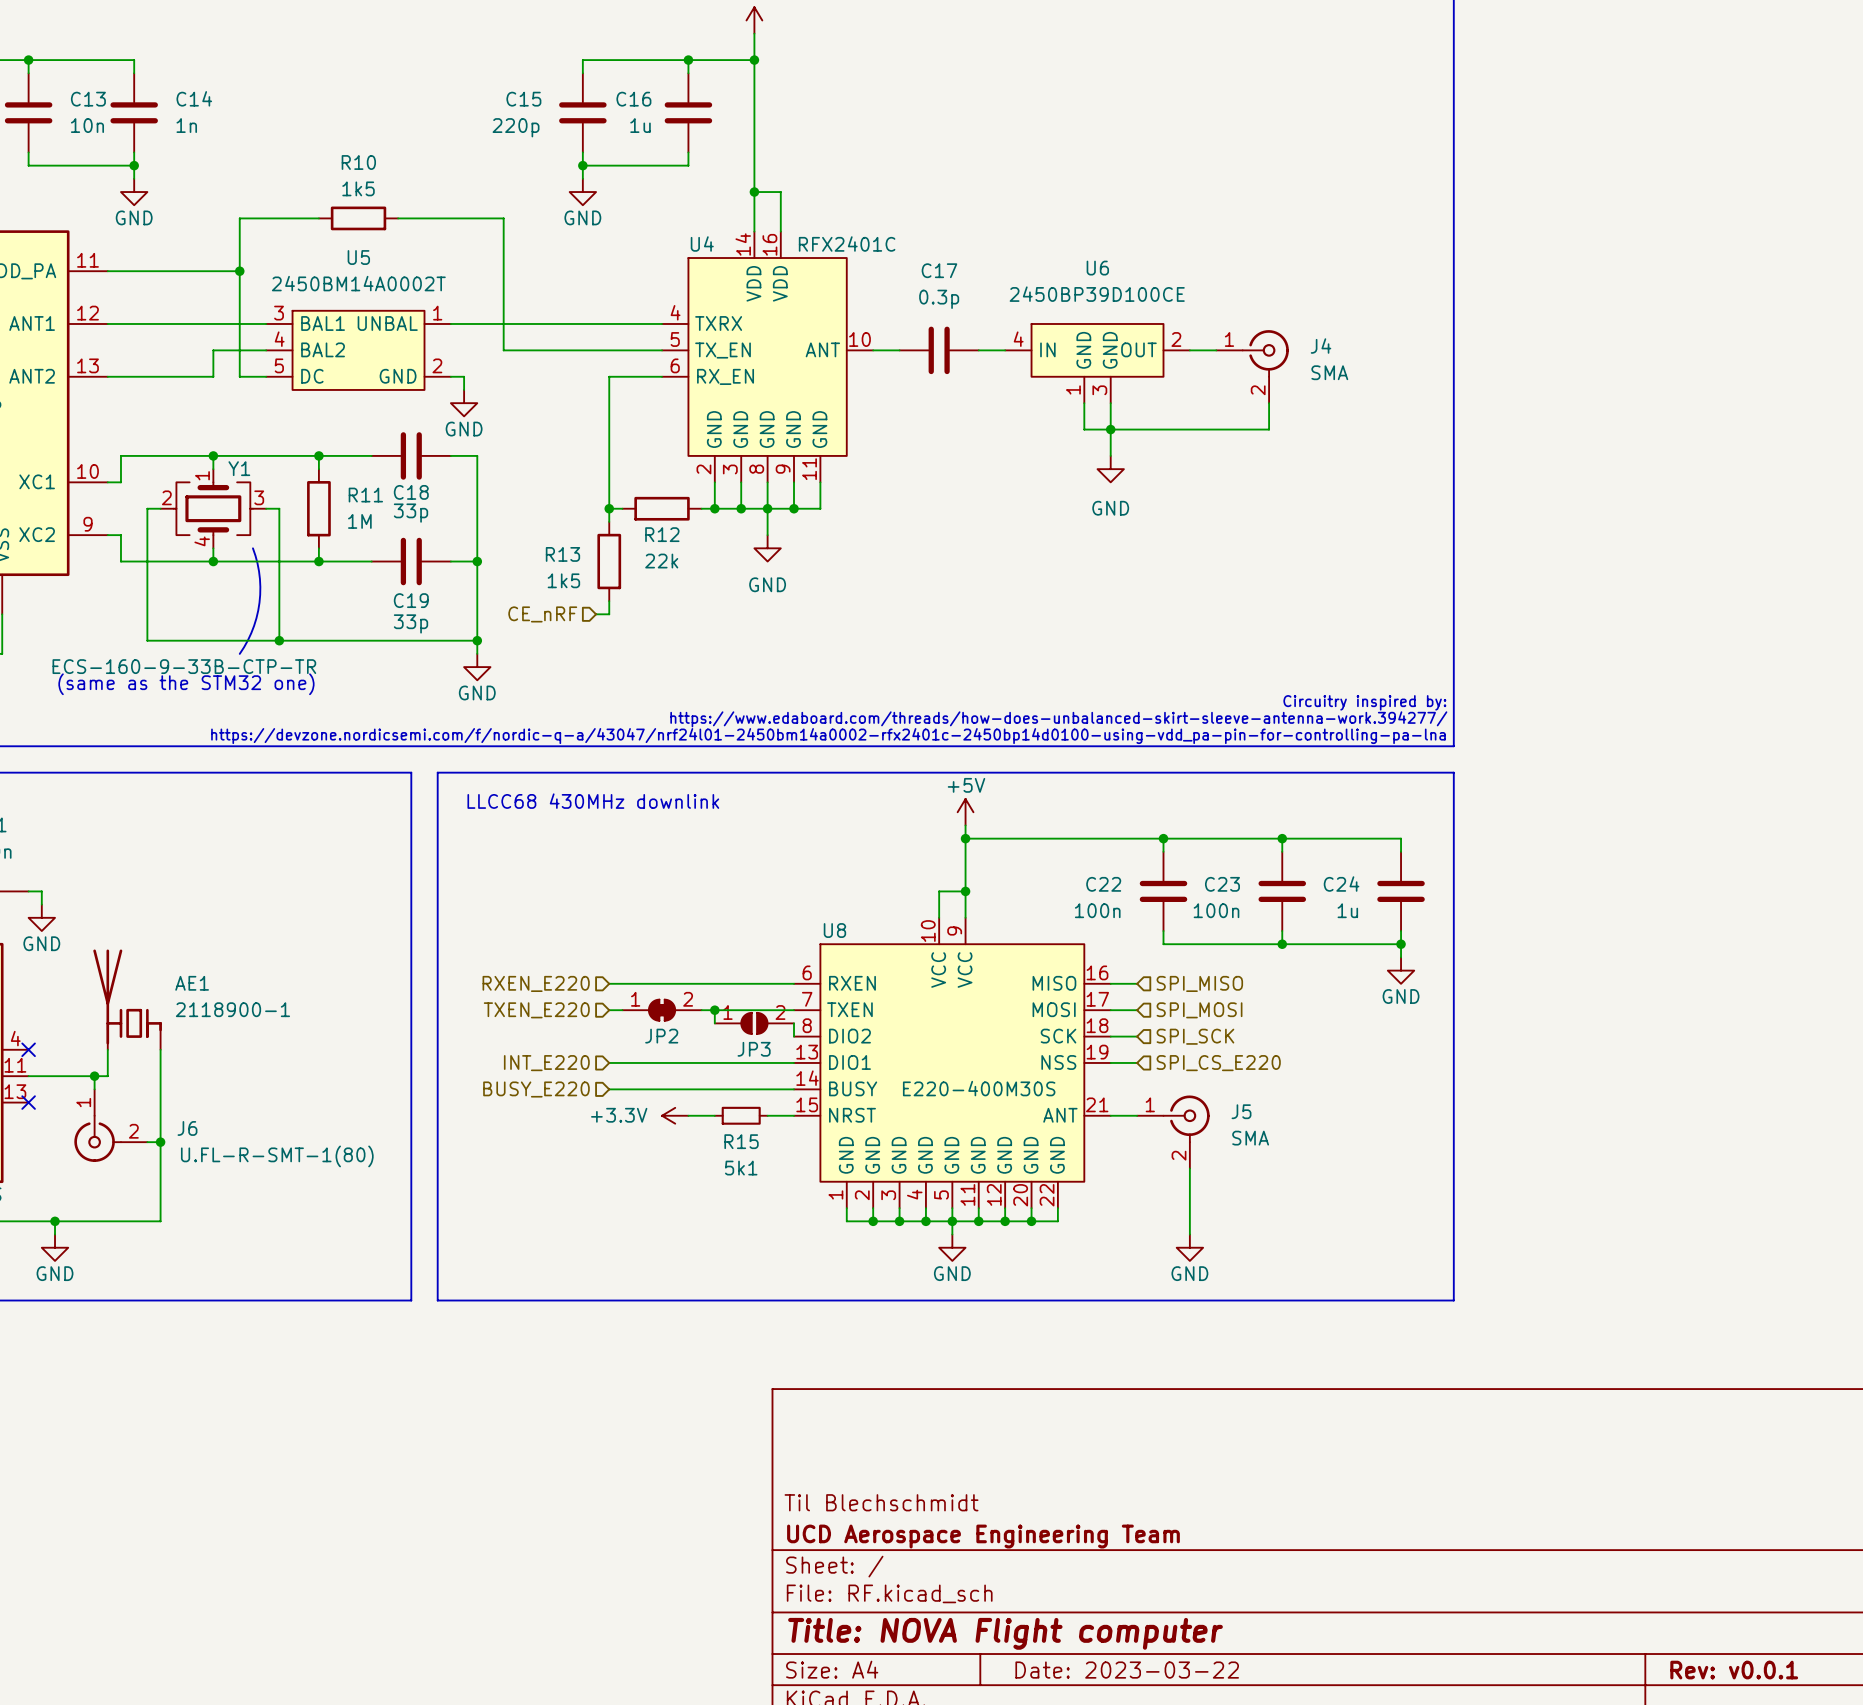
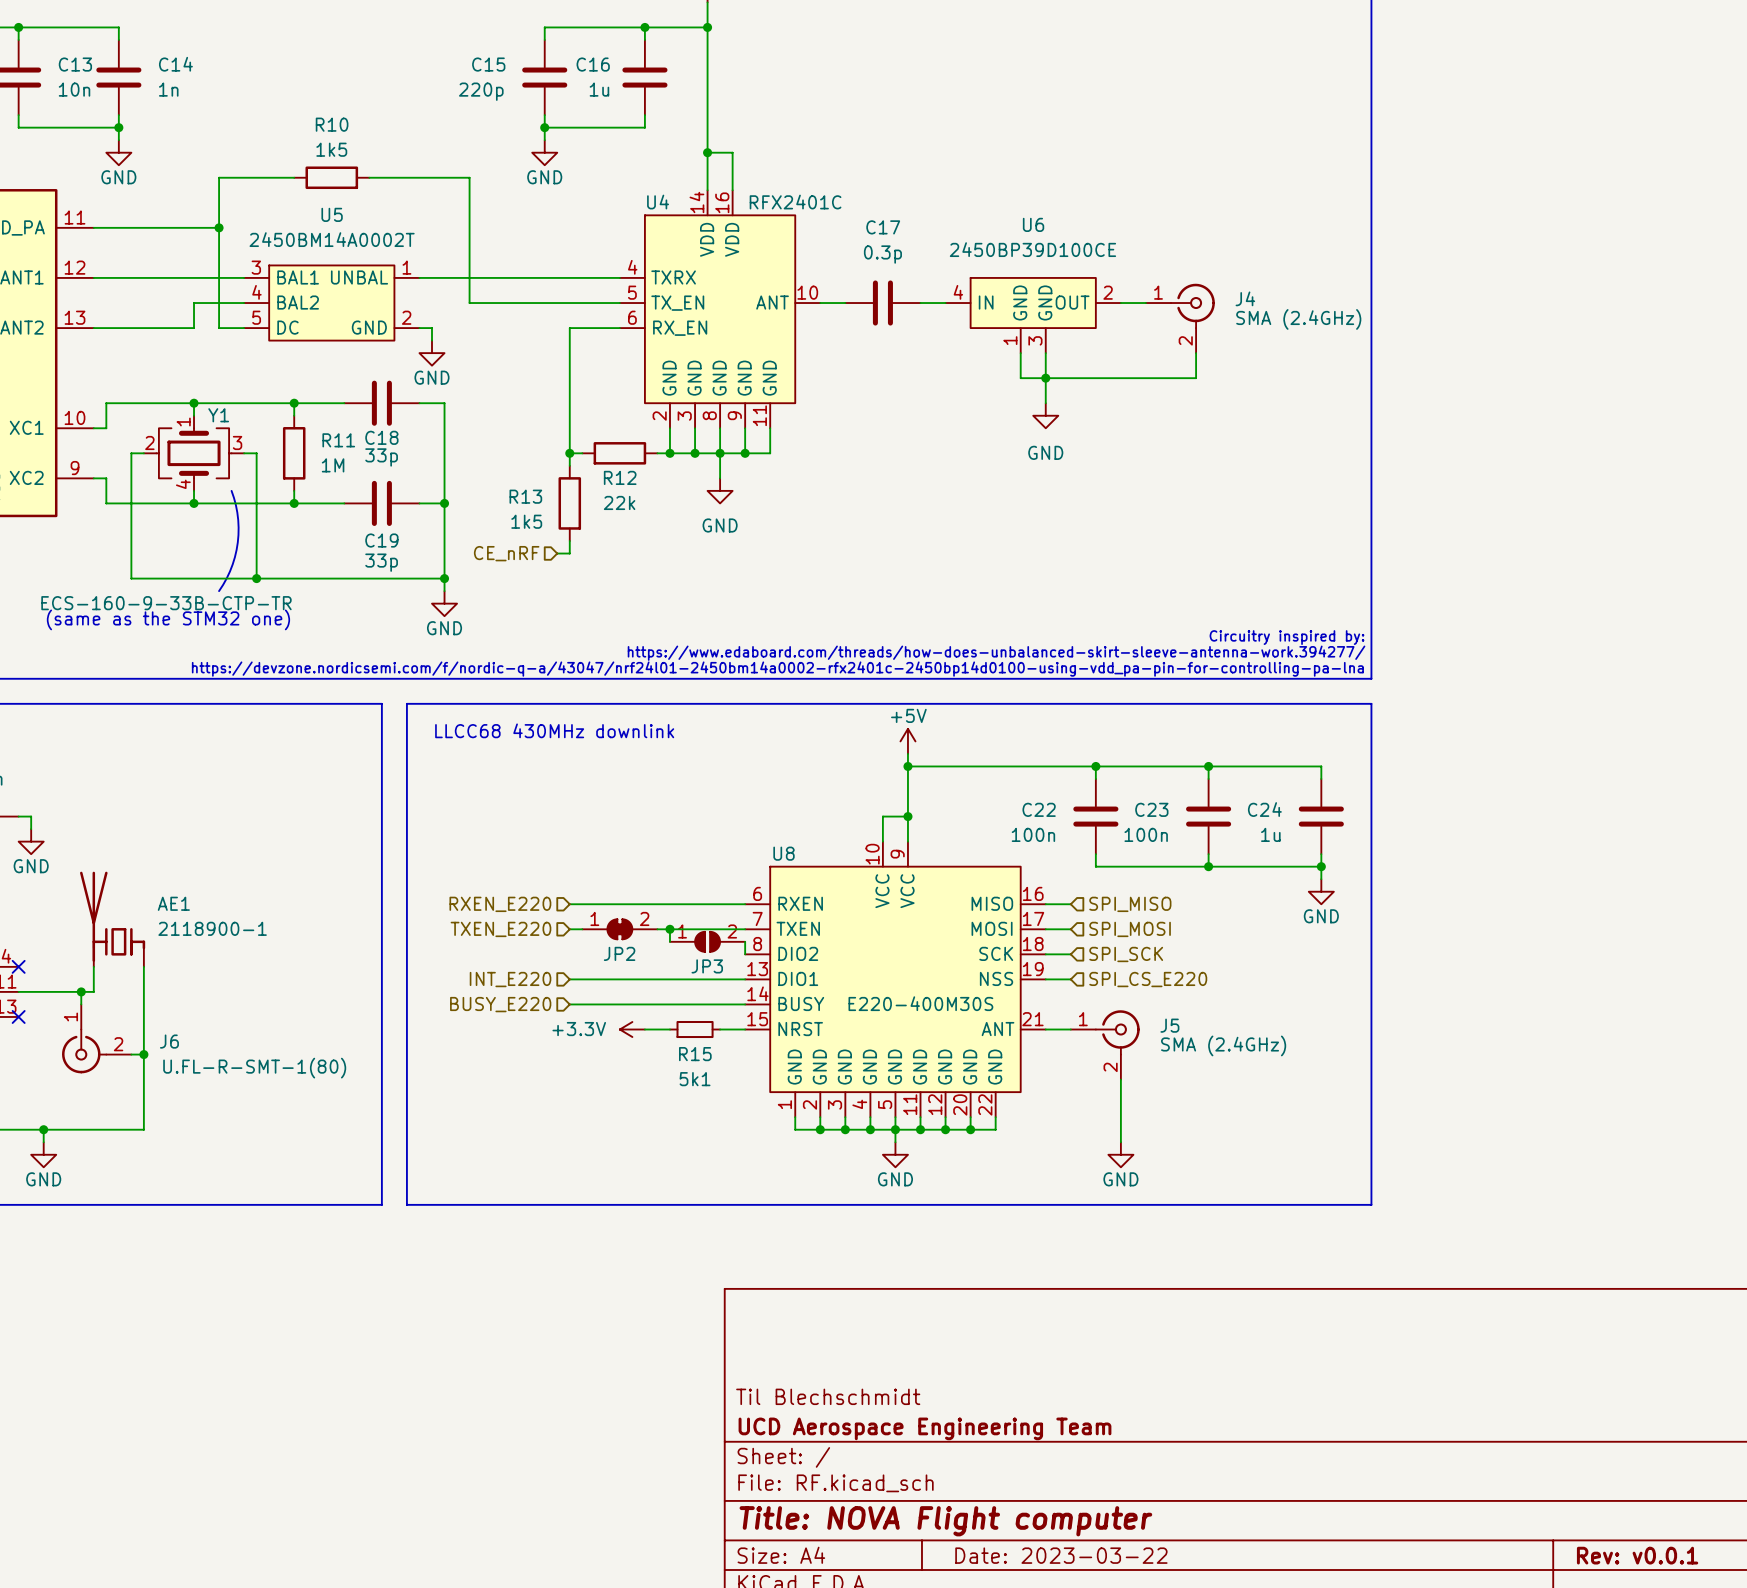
J4 value: SMA (1329, 372) -> SMA (2.4GHz) (1298, 319)
J5 value: SMA (1250, 1138) -> SMA (2.4GHz) (1223, 1045)

